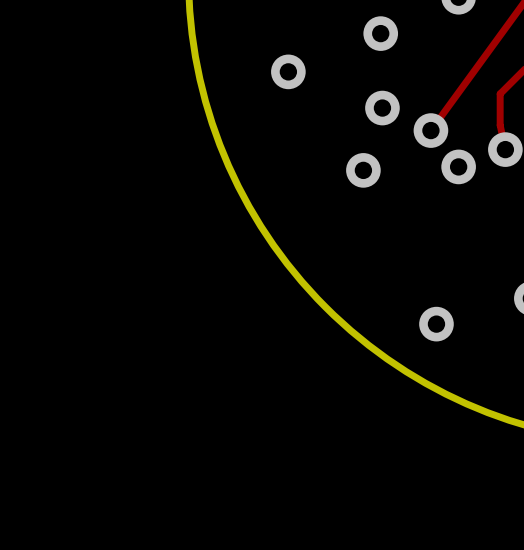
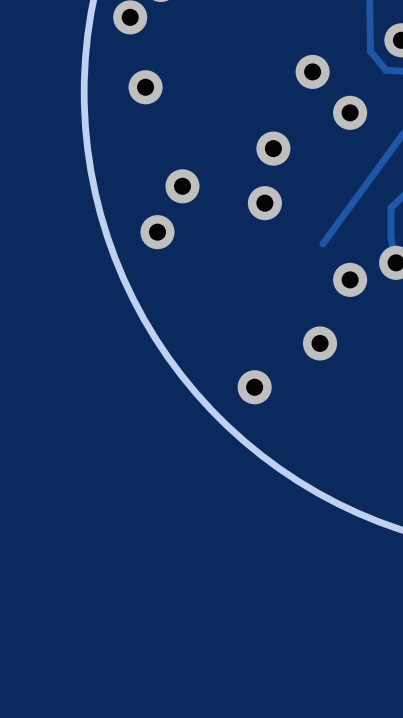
via position: (382, 108) -> (264, 203)
via: none -> (157, 232)
via: (430, 130) -> none
via: (363, 170) -> none
via: none -> (320, 343)
via: none -> (254, 387)
via: (436, 324) -> none

